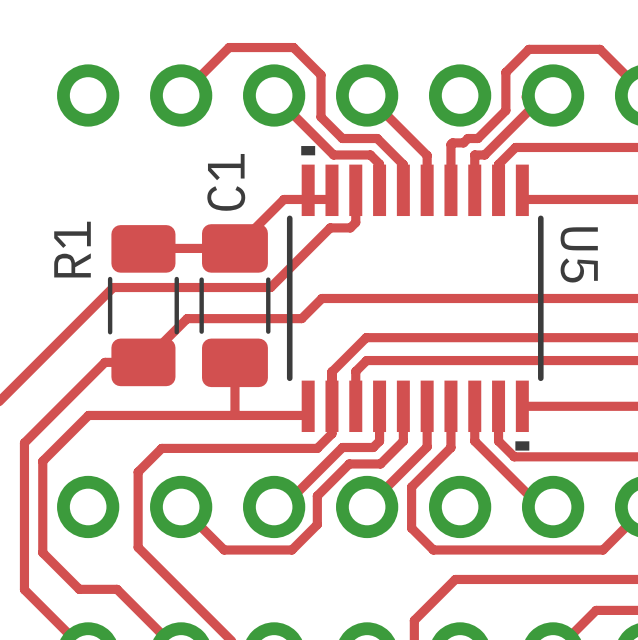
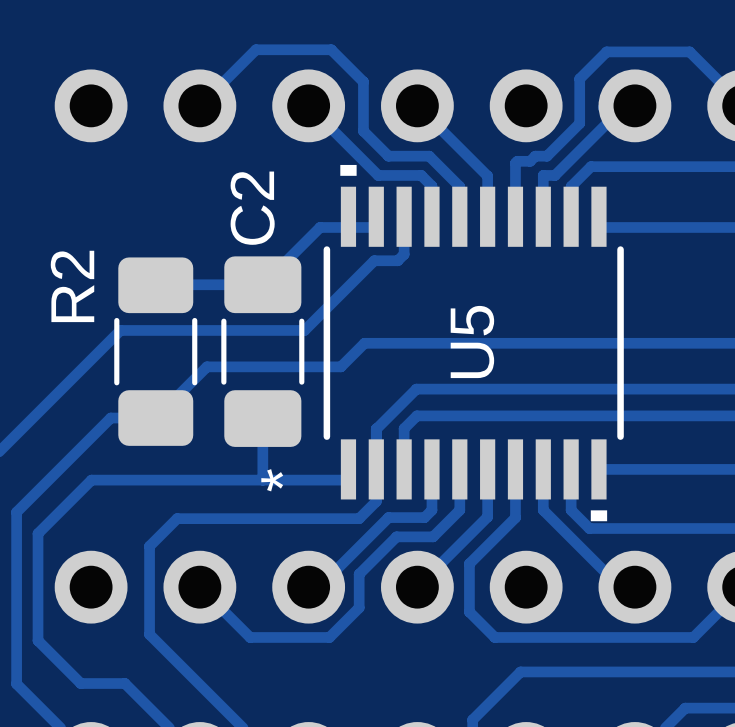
C1 name: C1 (226, 182) -> C2 (252, 208)
R1 name: R1 (72, 249) -> R2 (72, 286)
U5 name rotation: 0° (579, 254) -> 180° (472, 341)
U5 name position: U5 (579, 254) -> U5 (472, 341)
U5 text: none -> * (272, 480)

